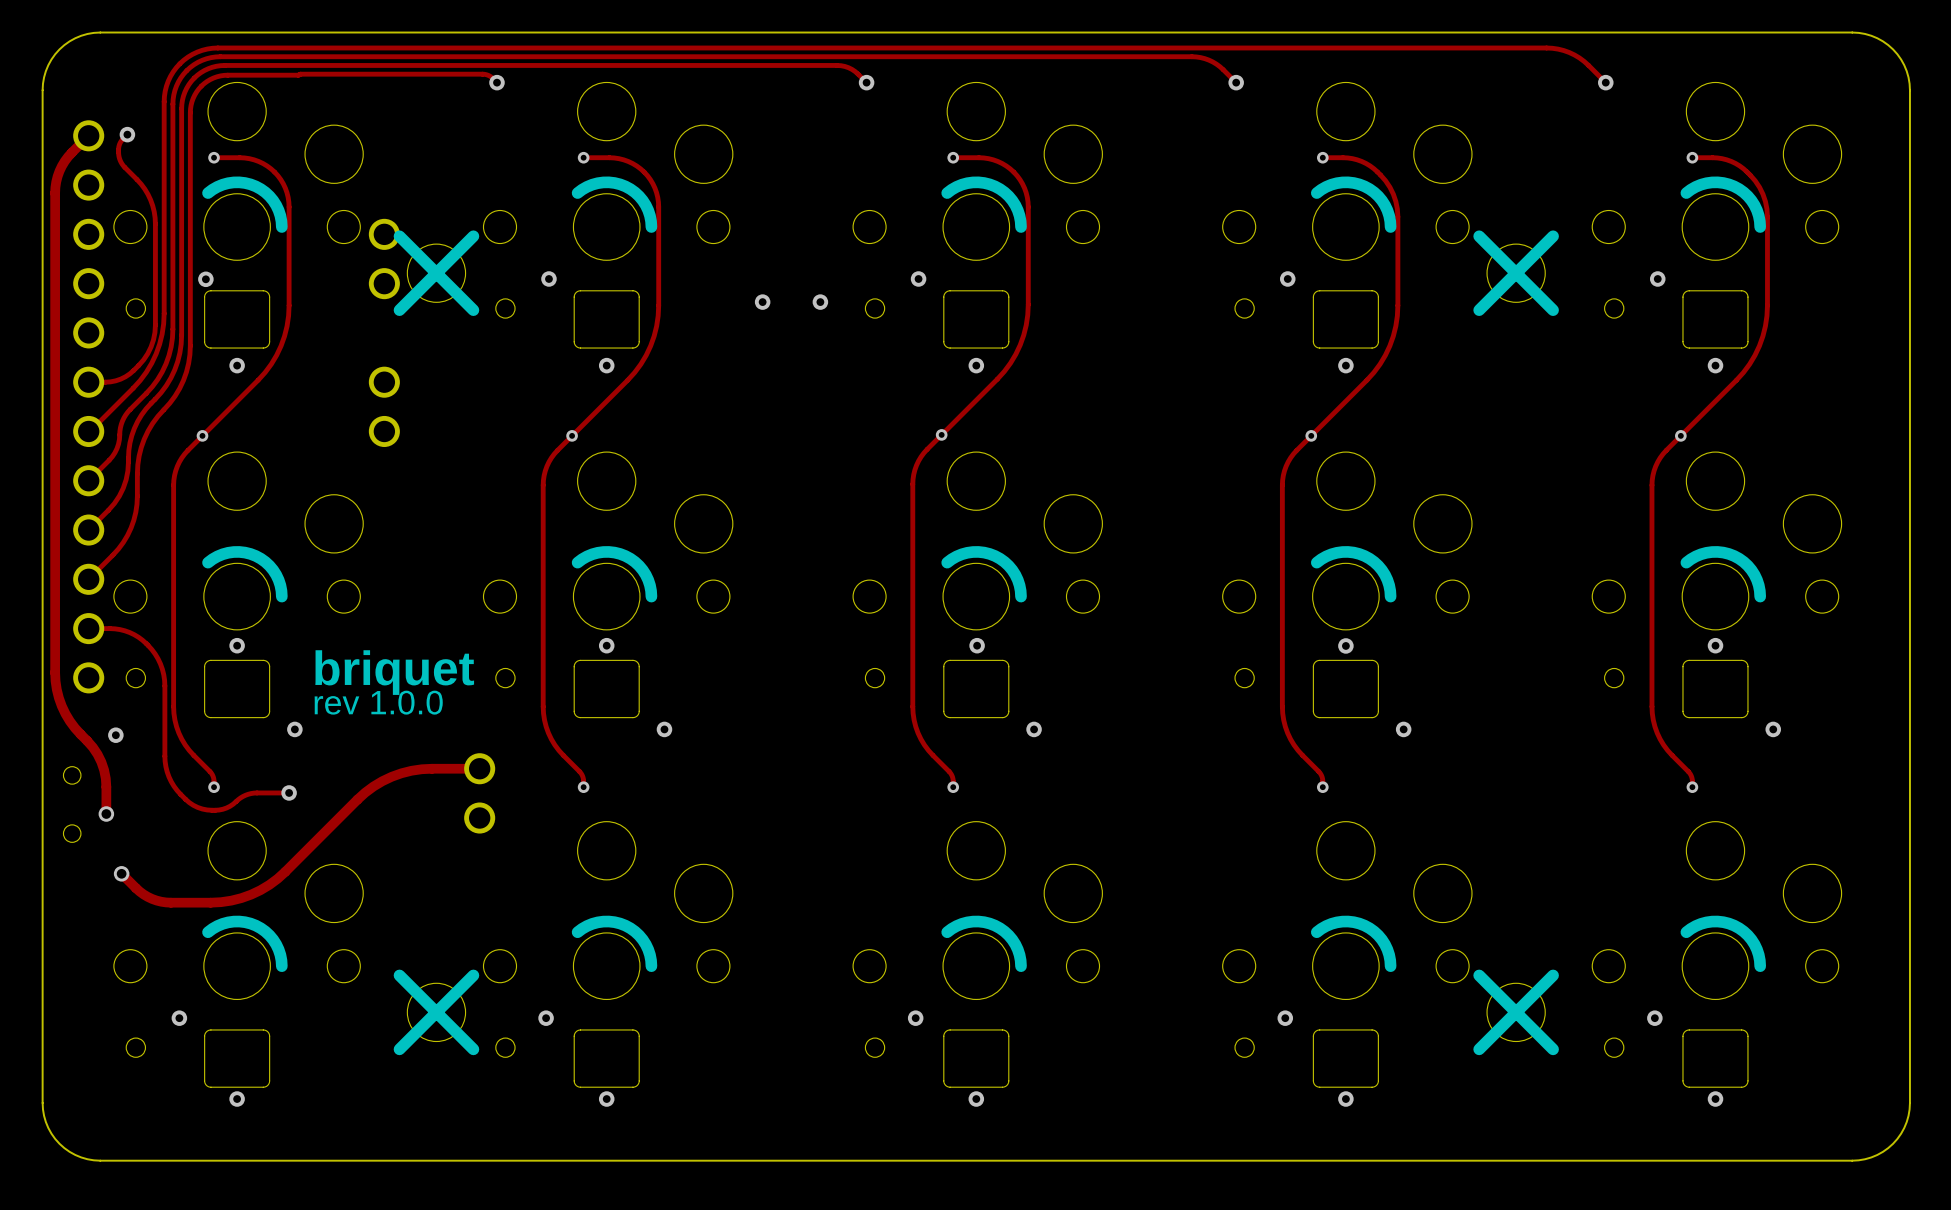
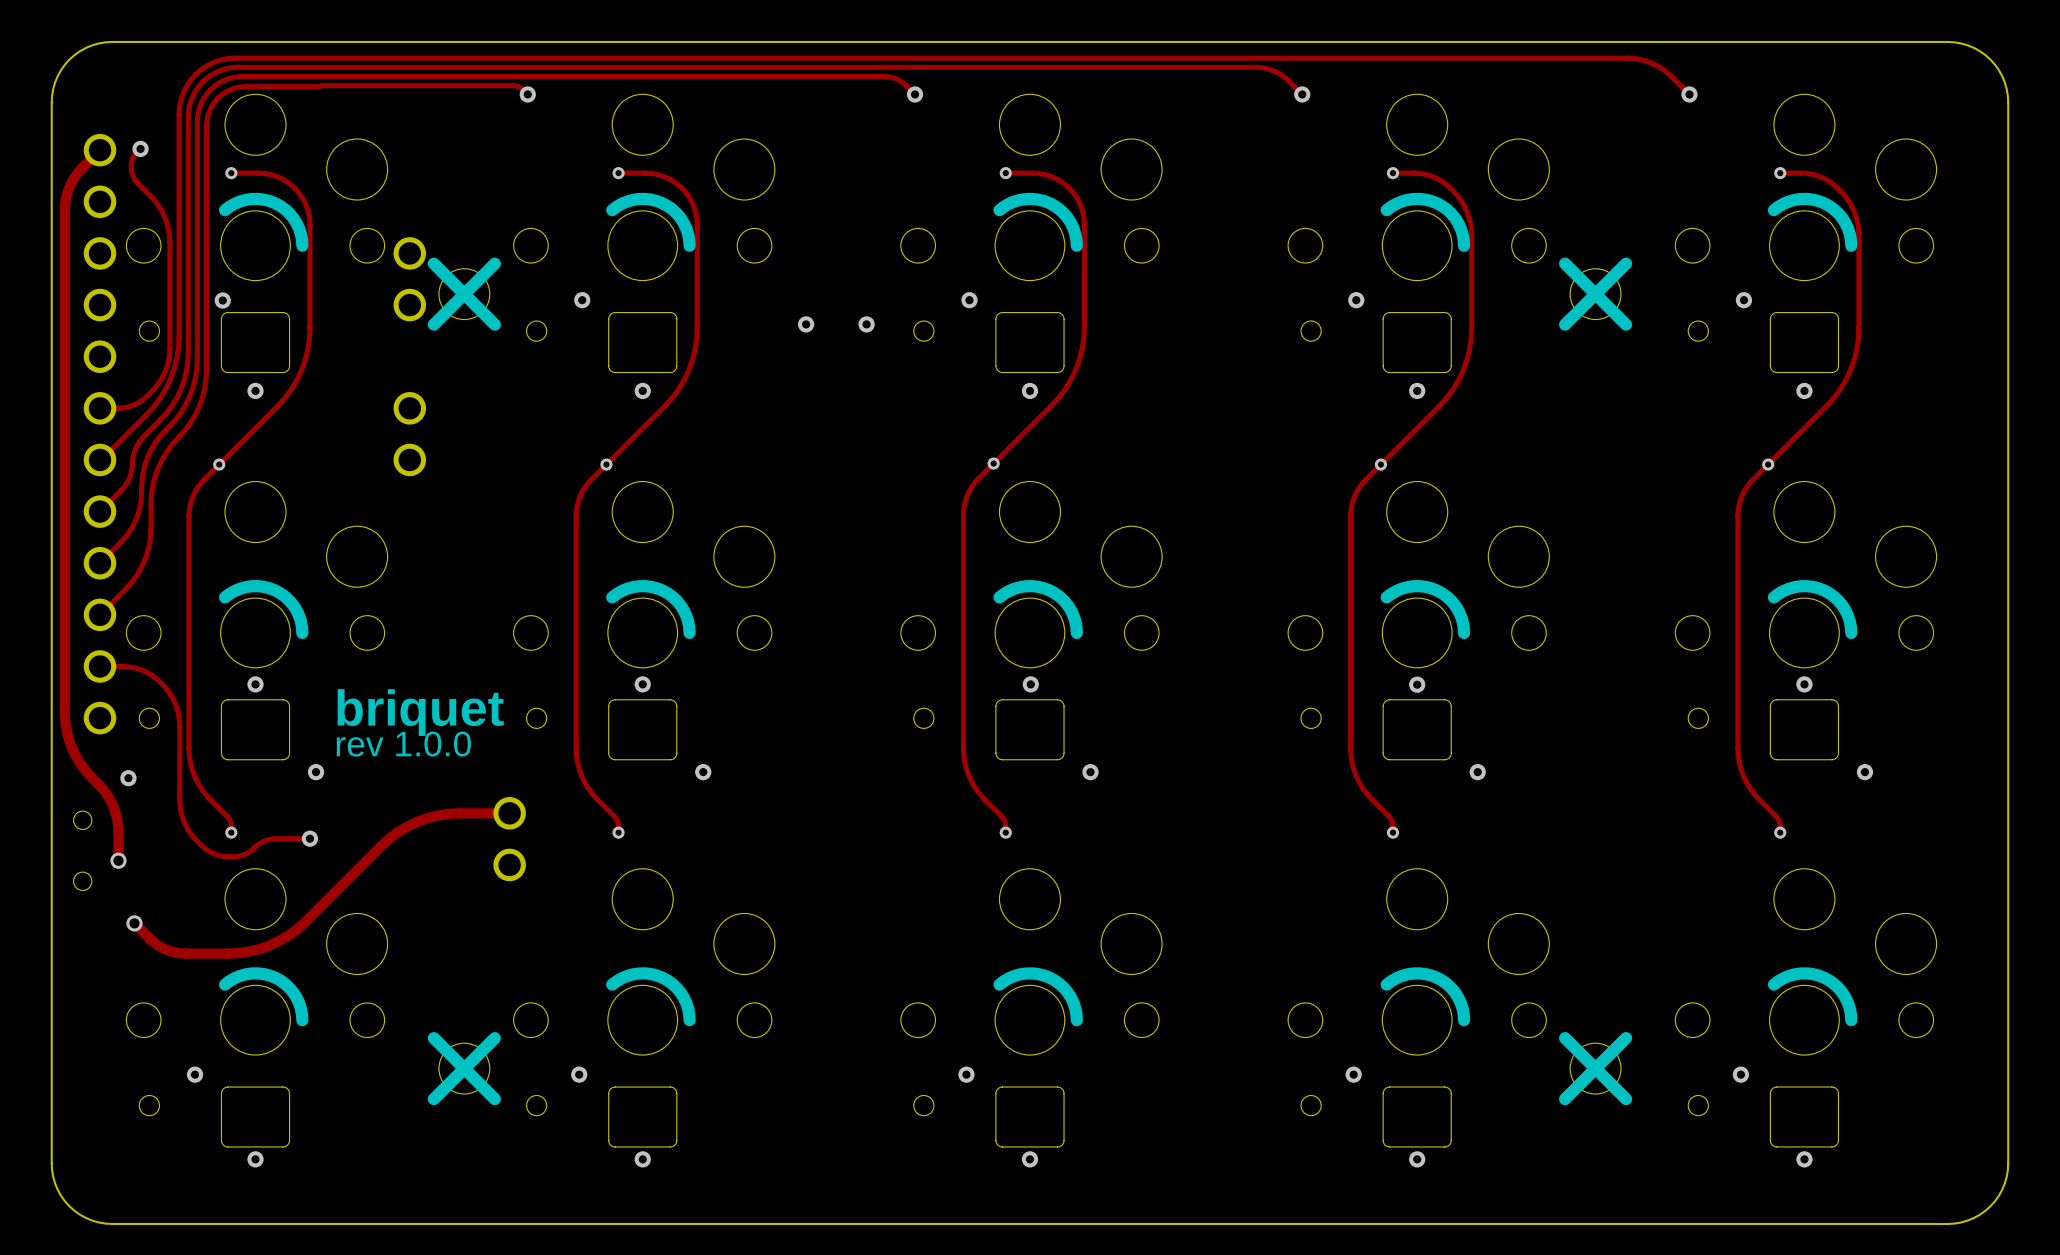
part footprint: [393, 230, 480, 316] -> [427, 257, 501, 331]
part footprint: [1473, 230, 1559, 316] -> [1558, 257, 1633, 331]
part footprint: [393, 969, 480, 1056] -> [427, 1032, 501, 1106]
part footprint: [1473, 969, 1559, 1056] -> [1558, 1032, 1633, 1106]

